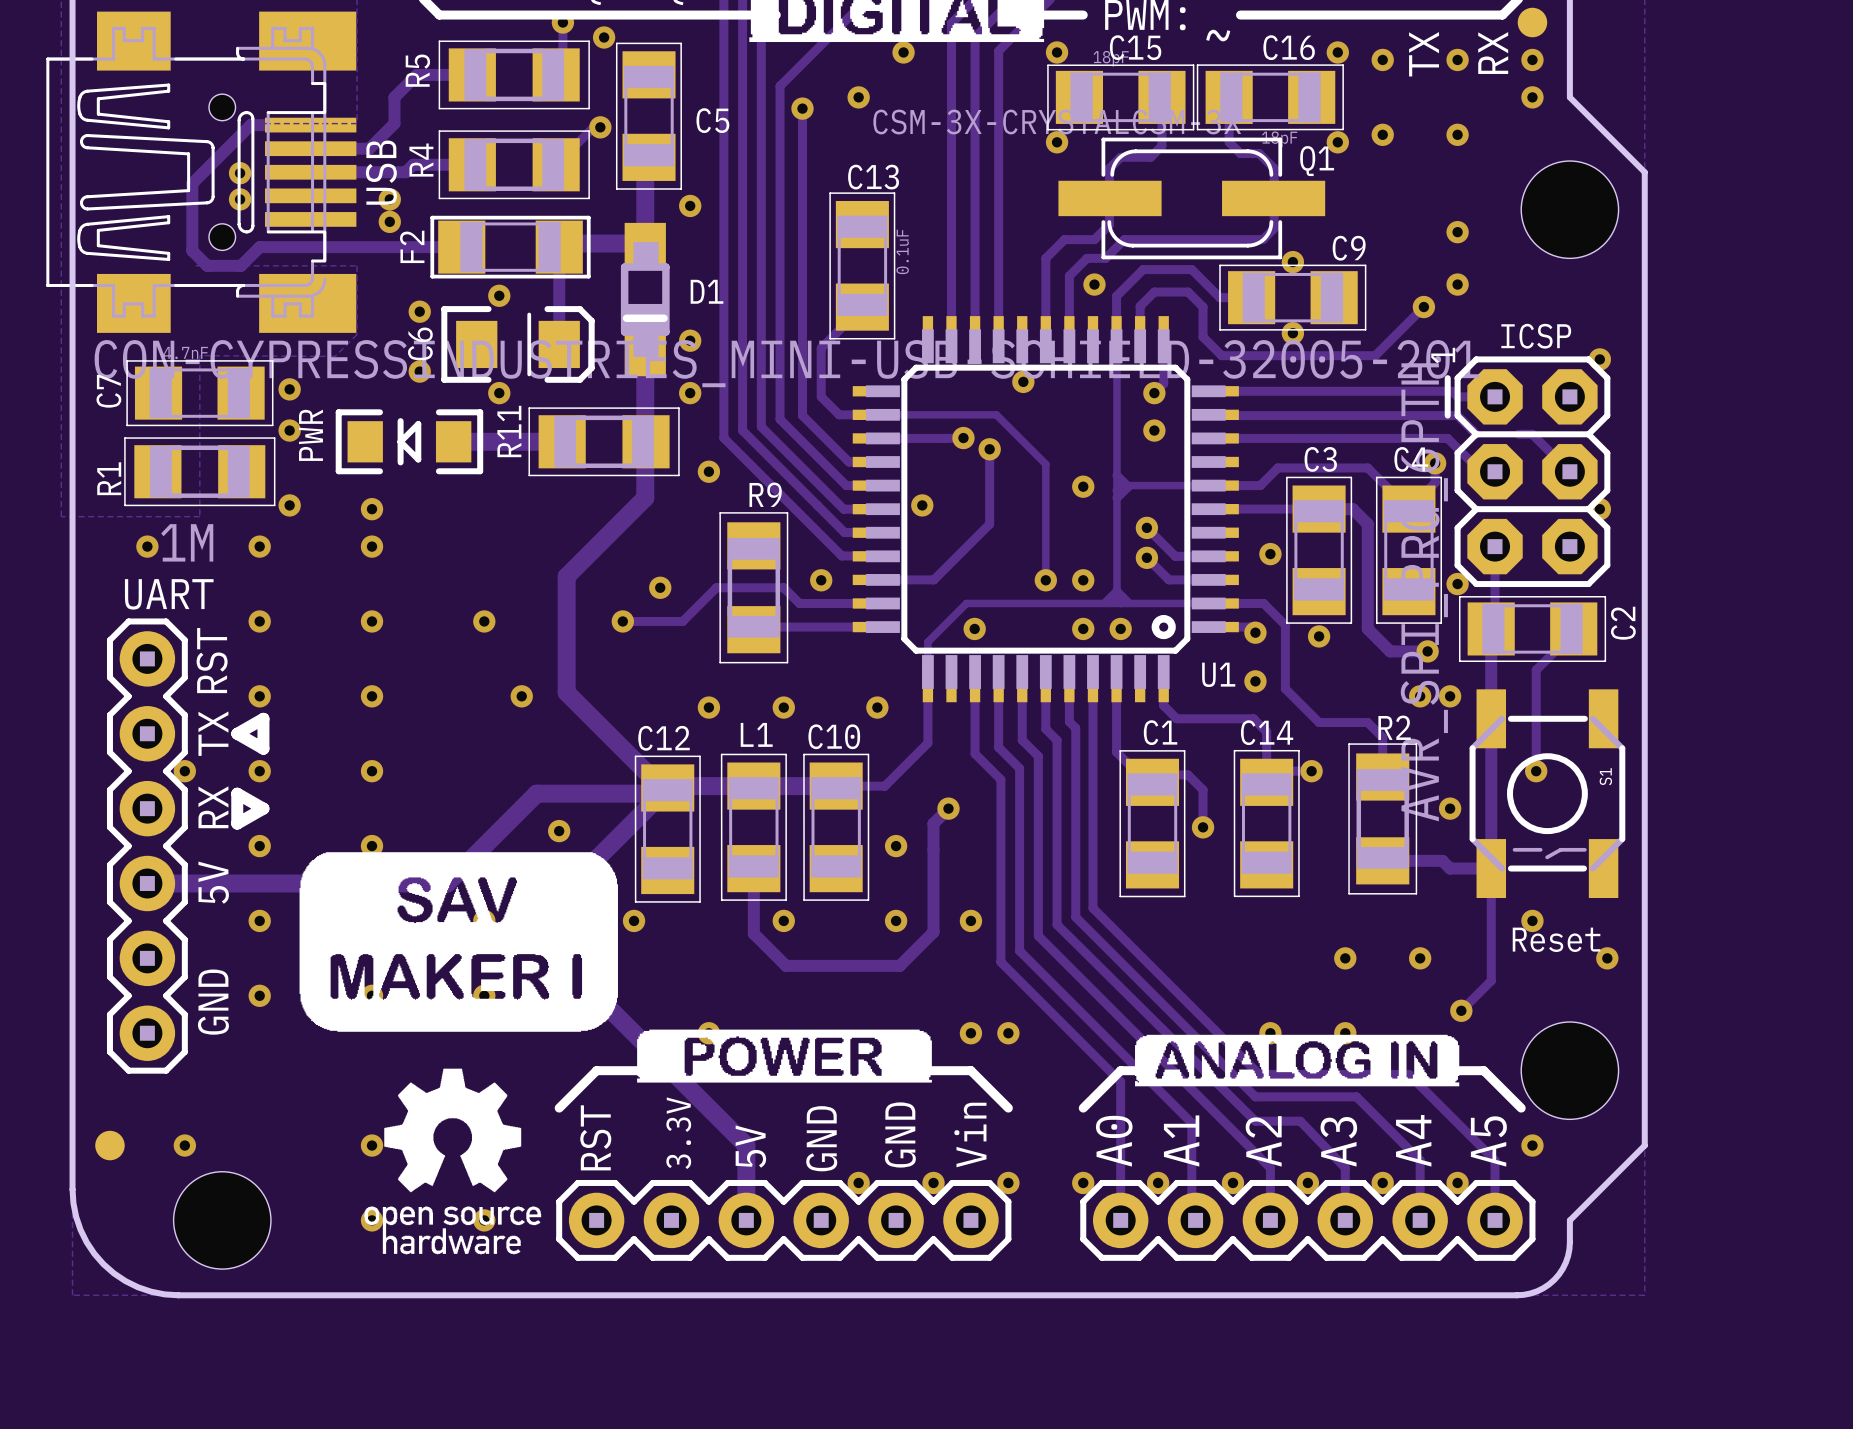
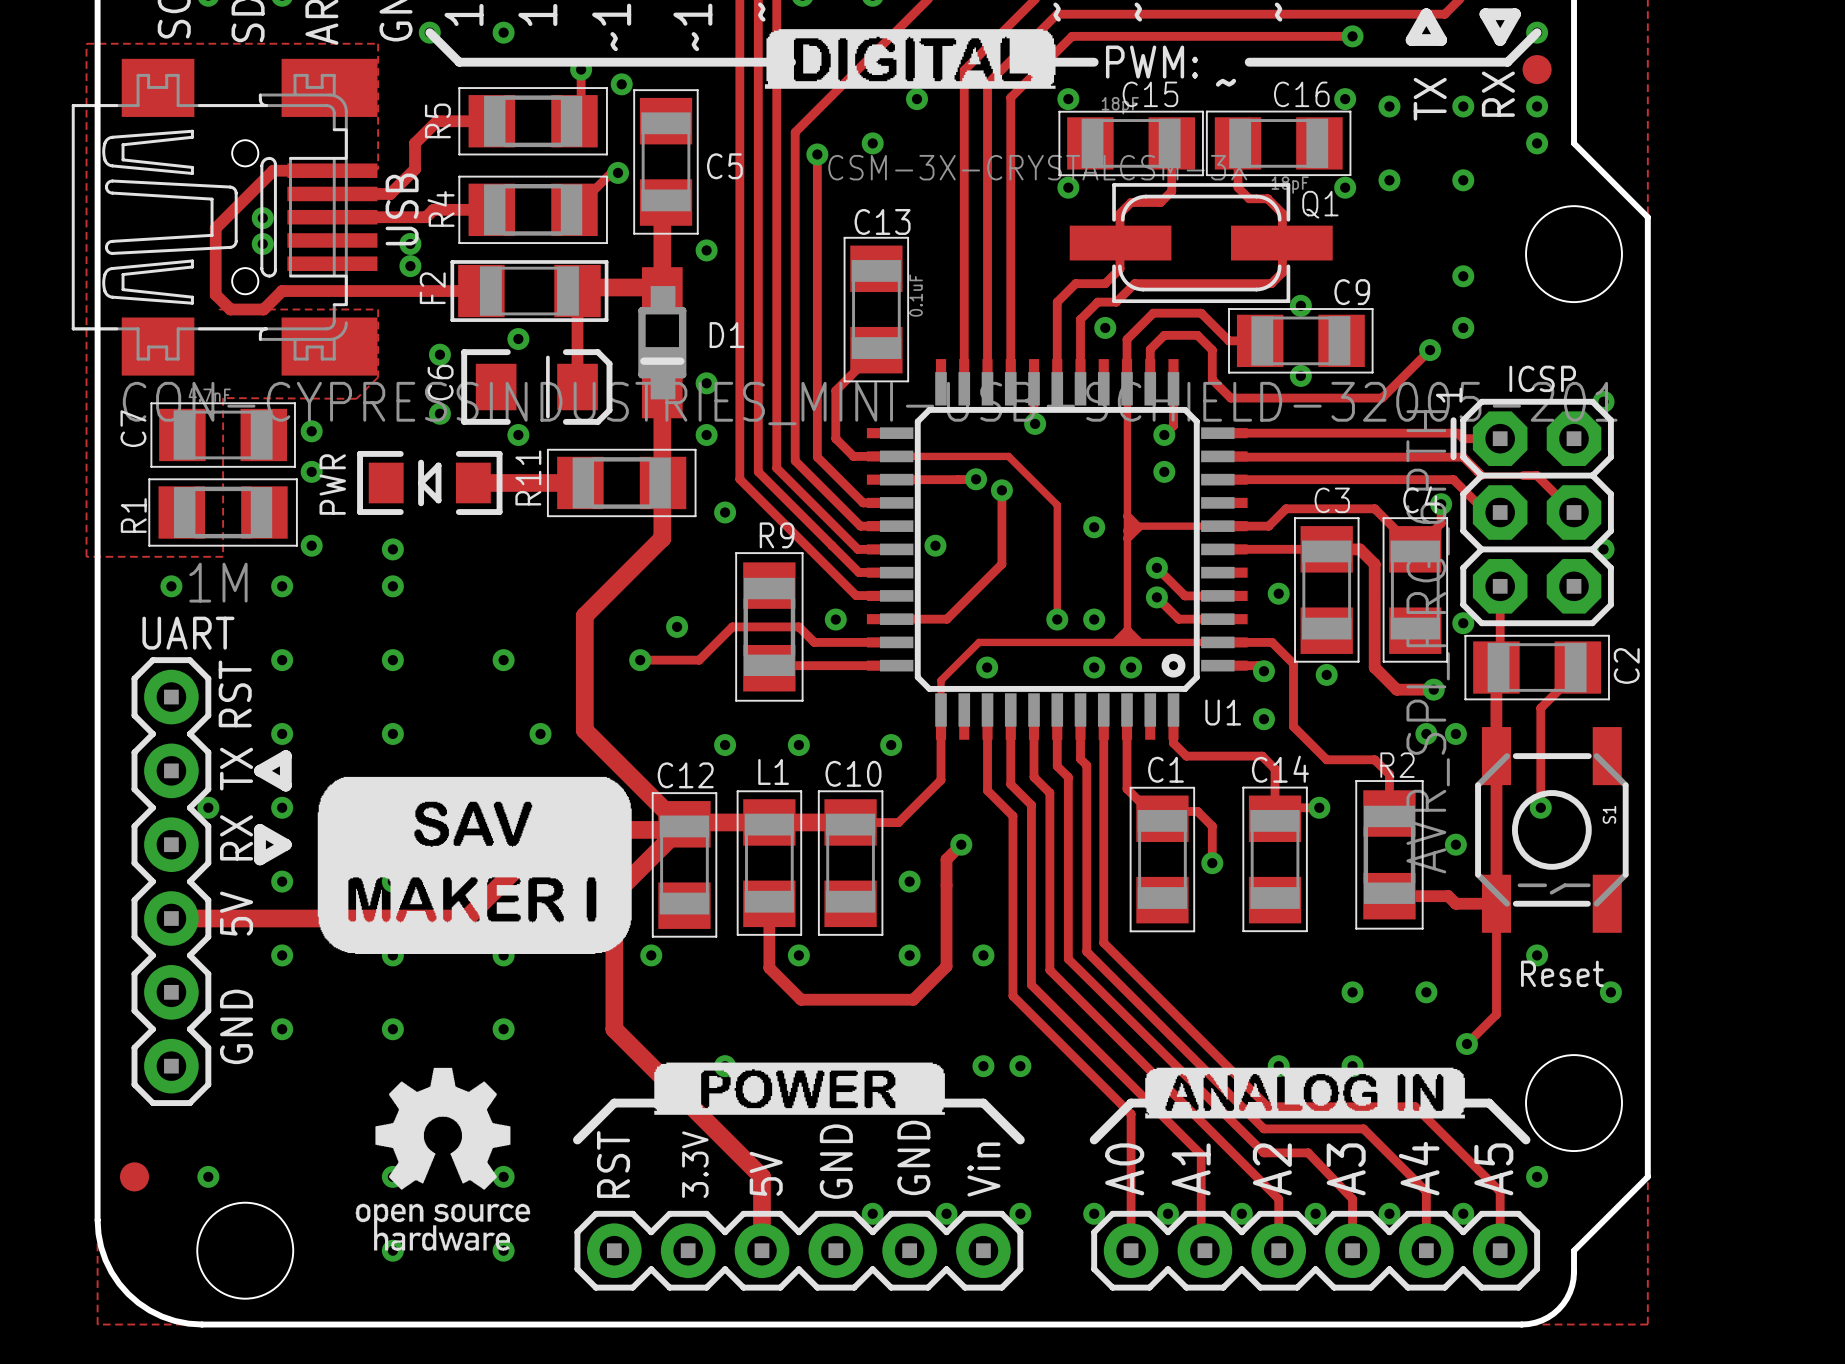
drawing position: (458, 941) -> (474, 865)
drawing position: (452, 1161) -> (442, 1159)

